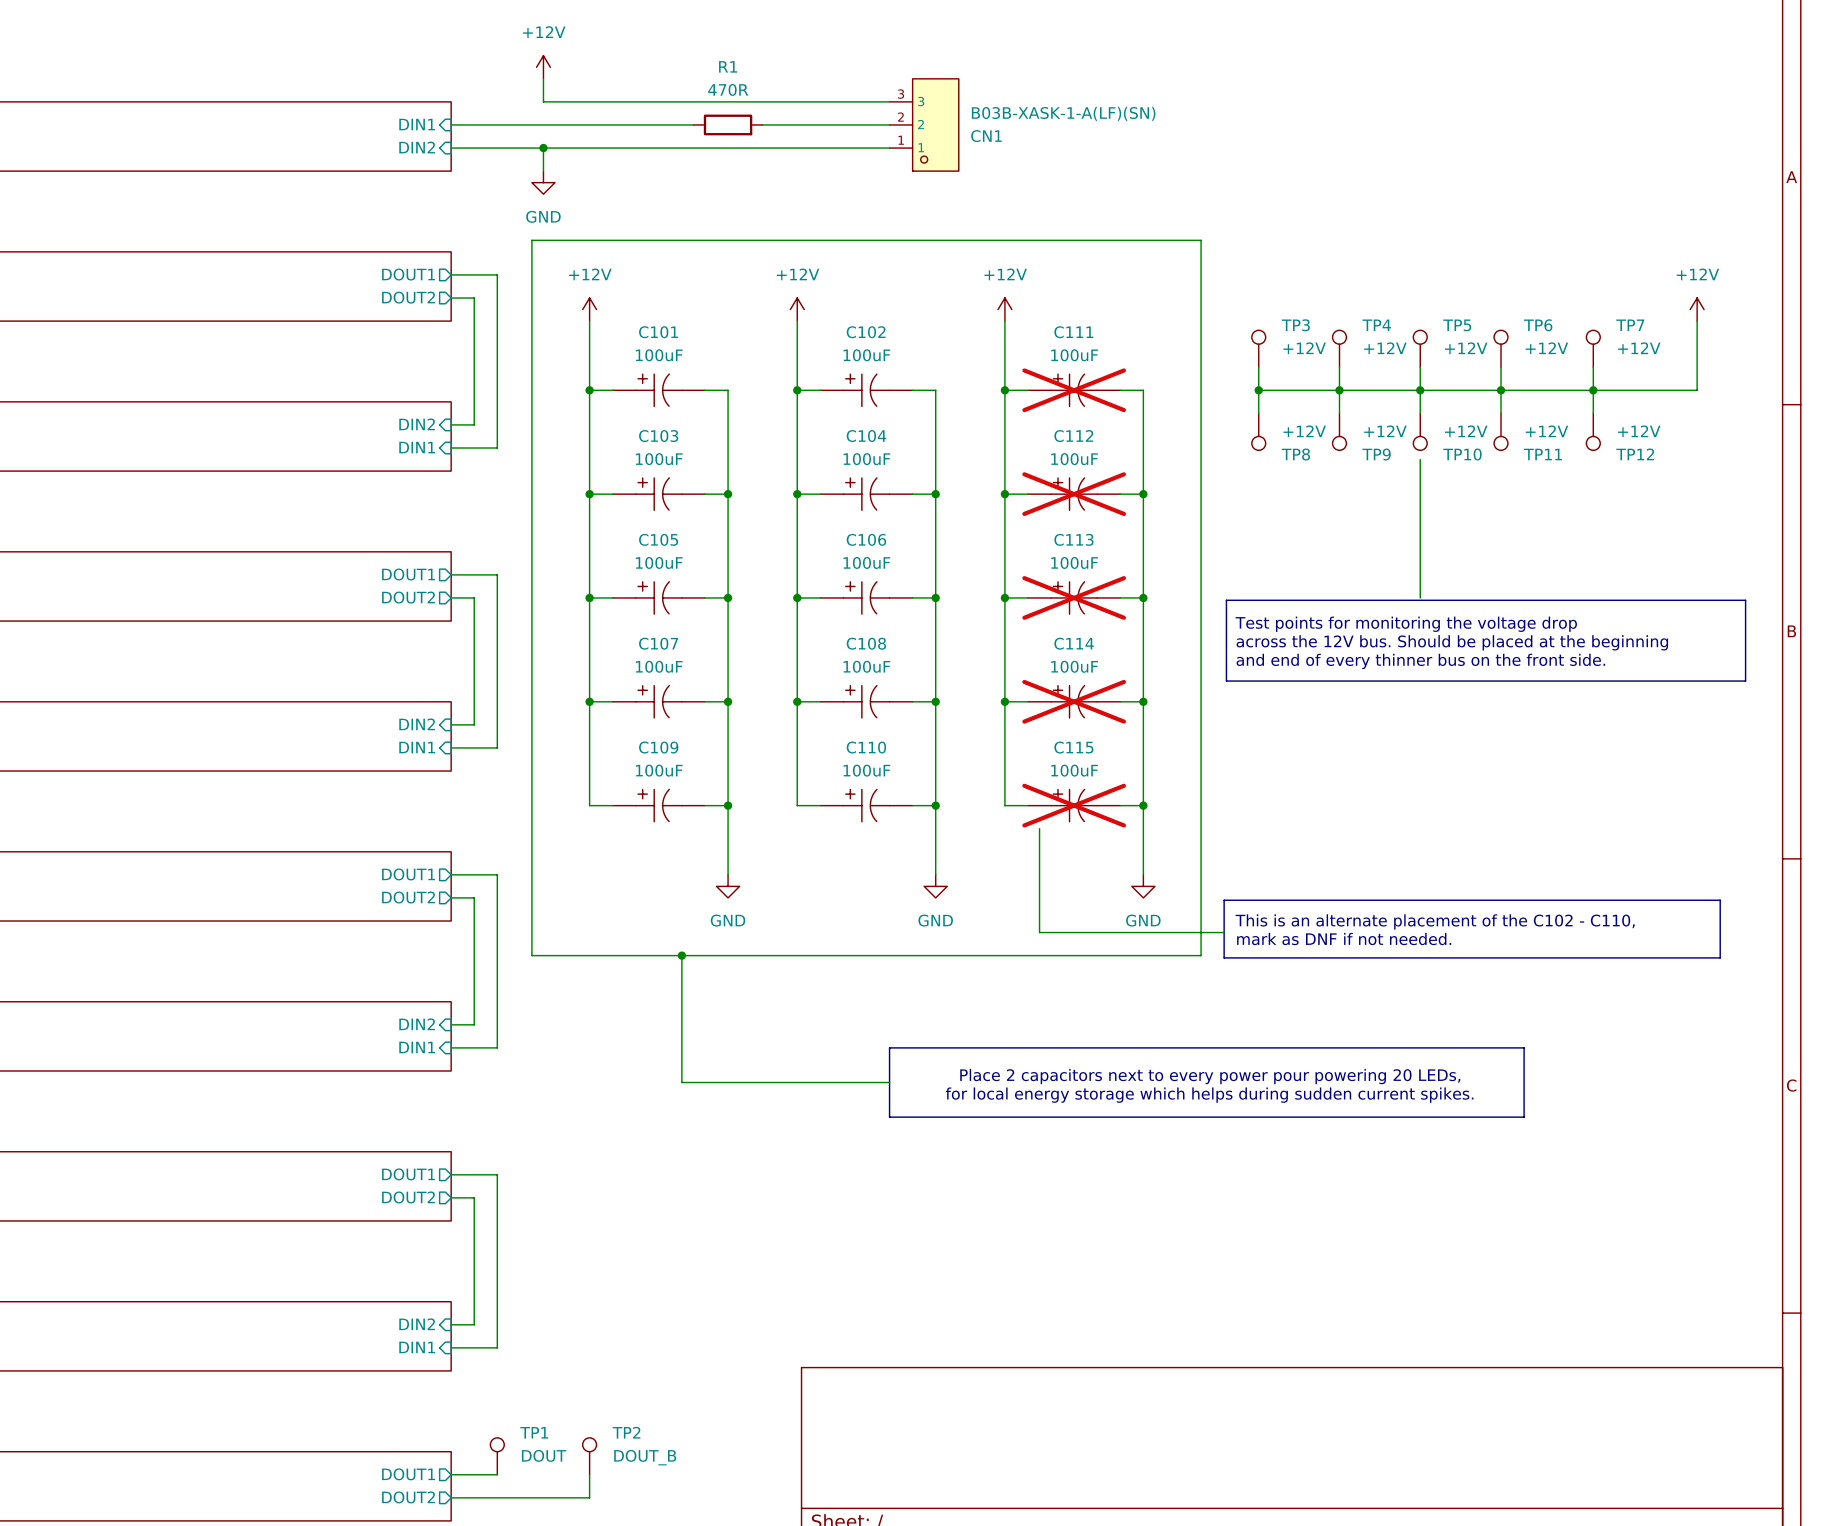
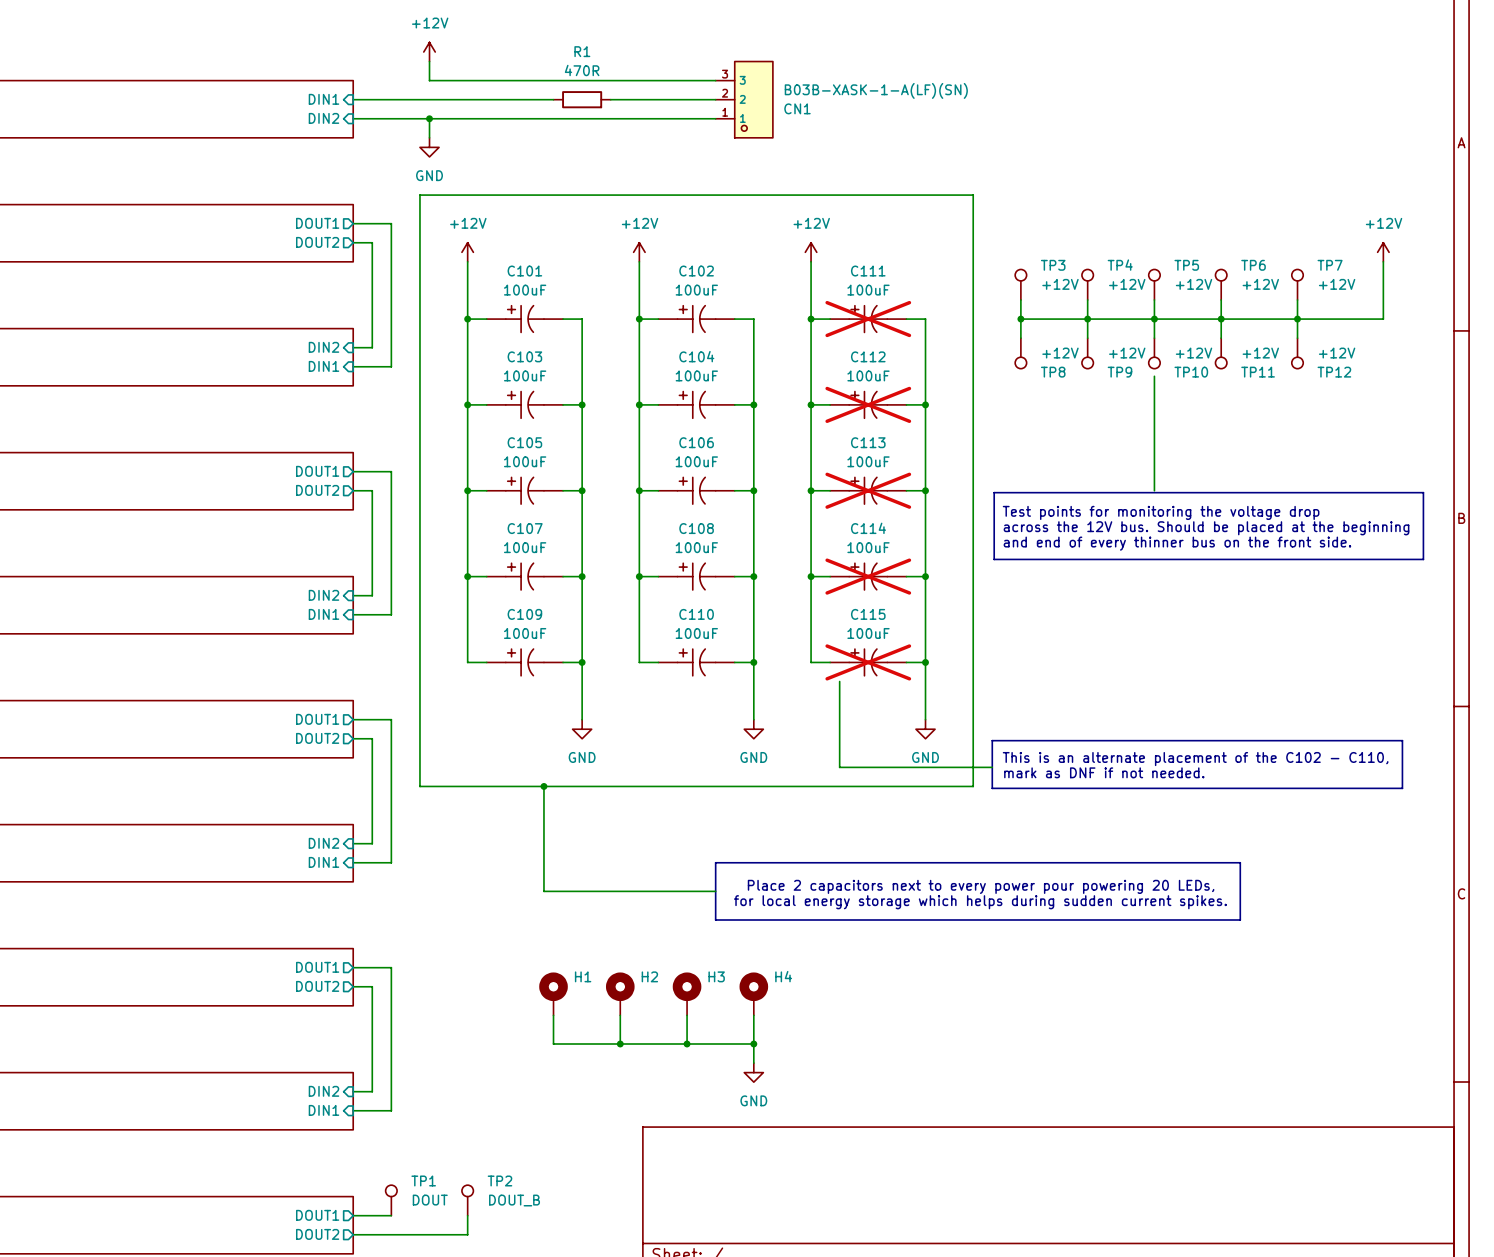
H1: none -> (553, 993)
H2: none -> (620, 993)
H3: none -> (687, 993)
H4: none -> (753, 993)
wire: none -> (553, 1015) (553, 1043) (753, 1043)
wire: none -> (620, 1015) (620, 1043)
wire: none -> (687, 1015) (687, 1043)
wire: none -> (753, 1015) (753, 1063)
junction: none -> (620, 1043)
junction: none -> (687, 1043)
junction: none -> (753, 1043)
power symbol: none -> GND (753, 1072)

